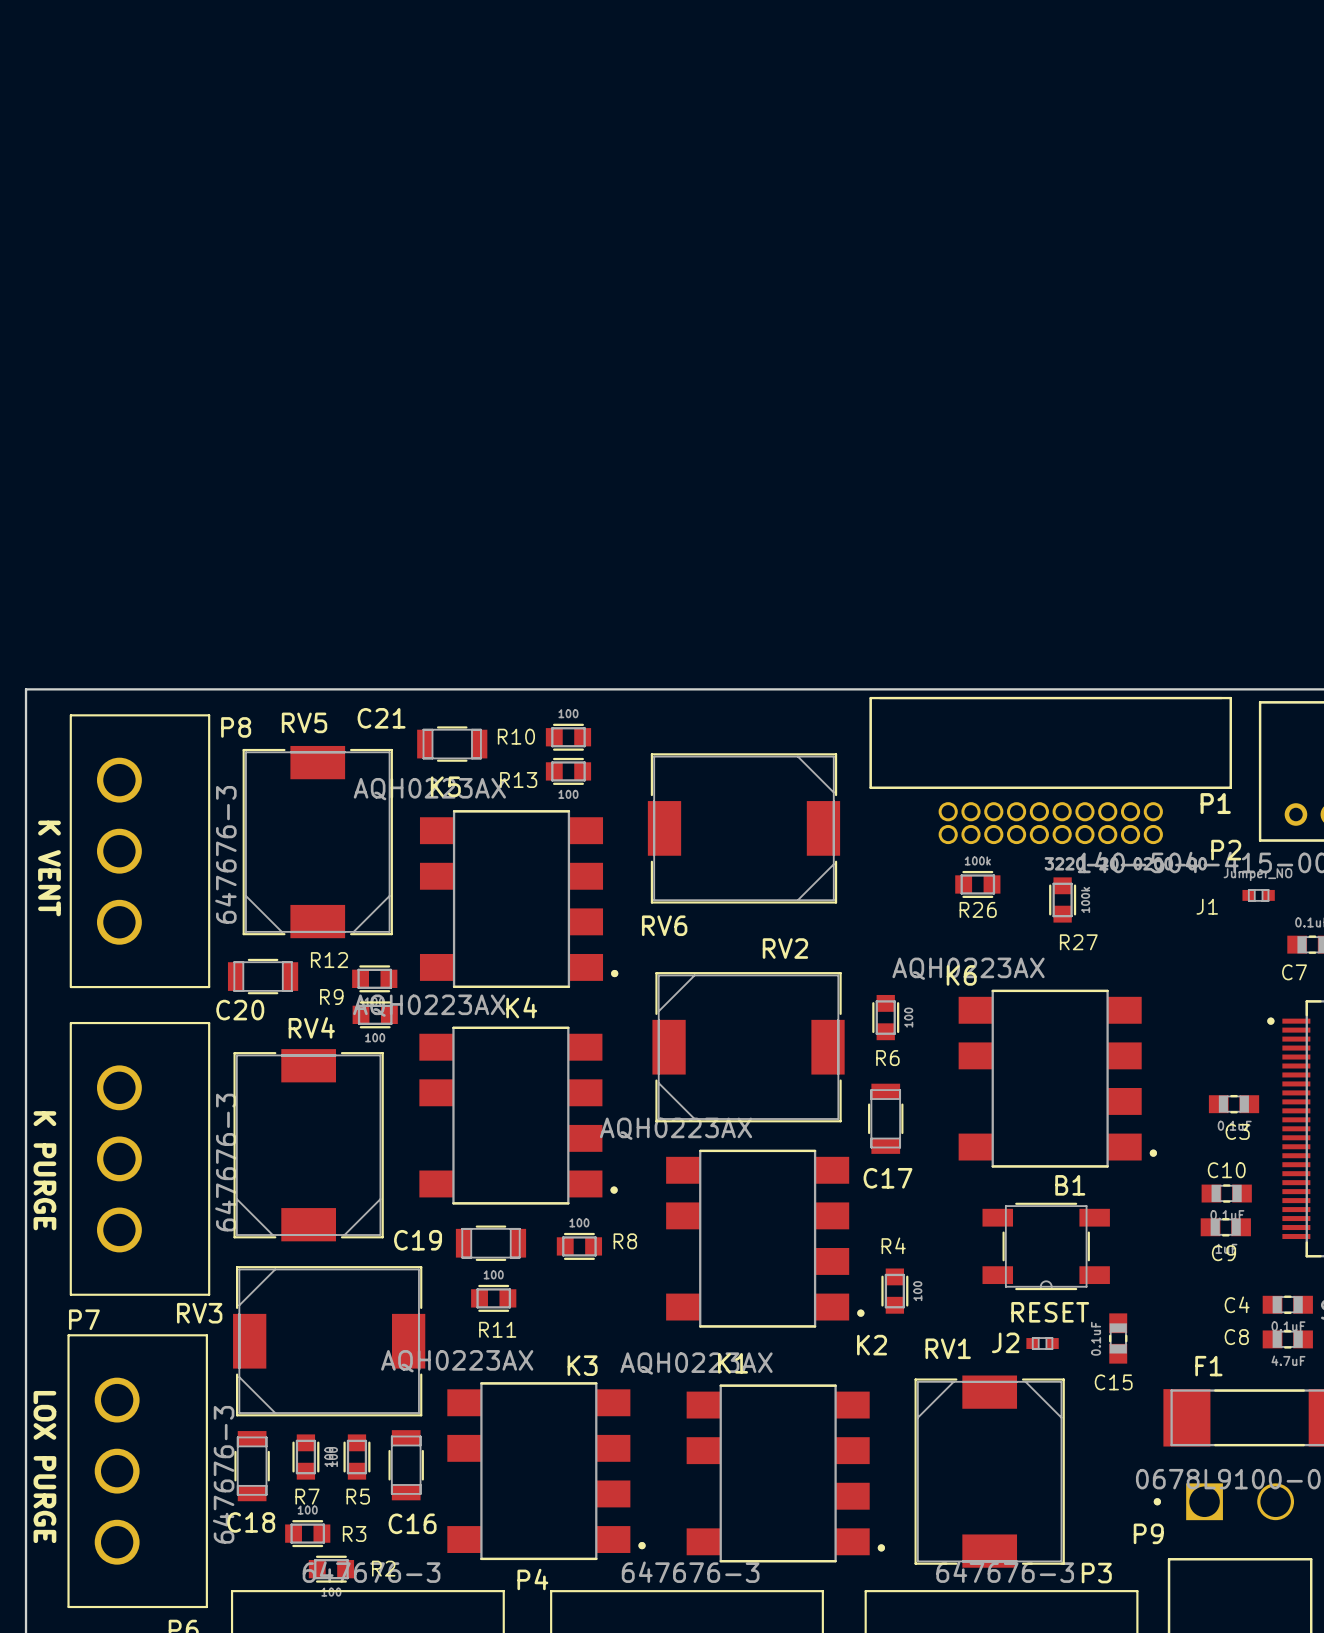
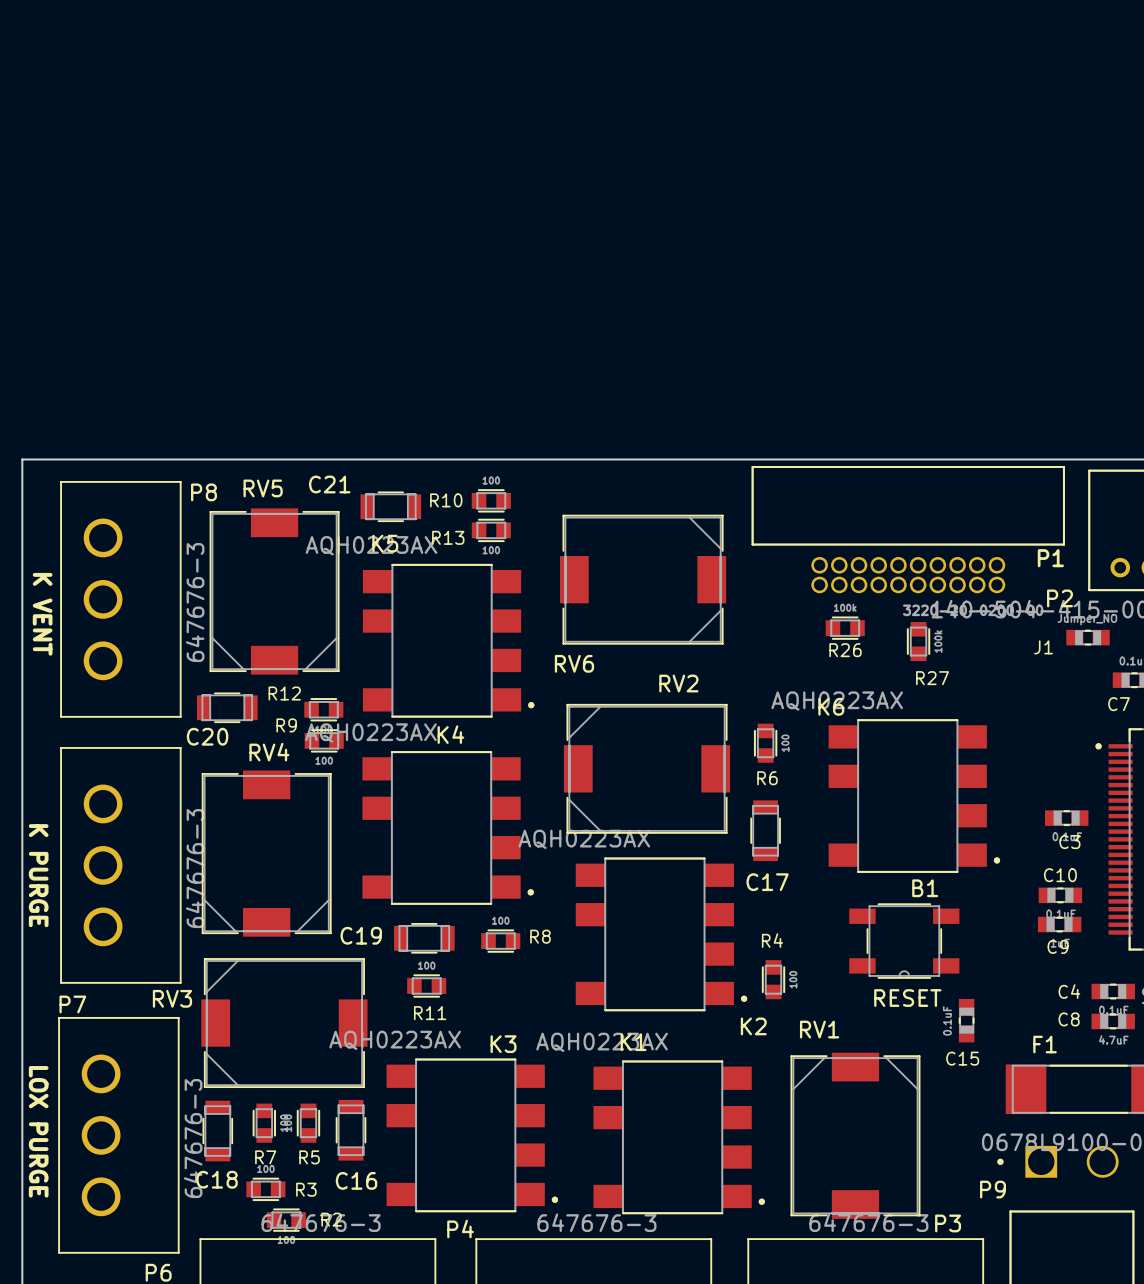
J1 footprint: [1242, 889, 1275, 902] -> [1066, 629, 1110, 646]
J2: (1042, 1343) -> none

